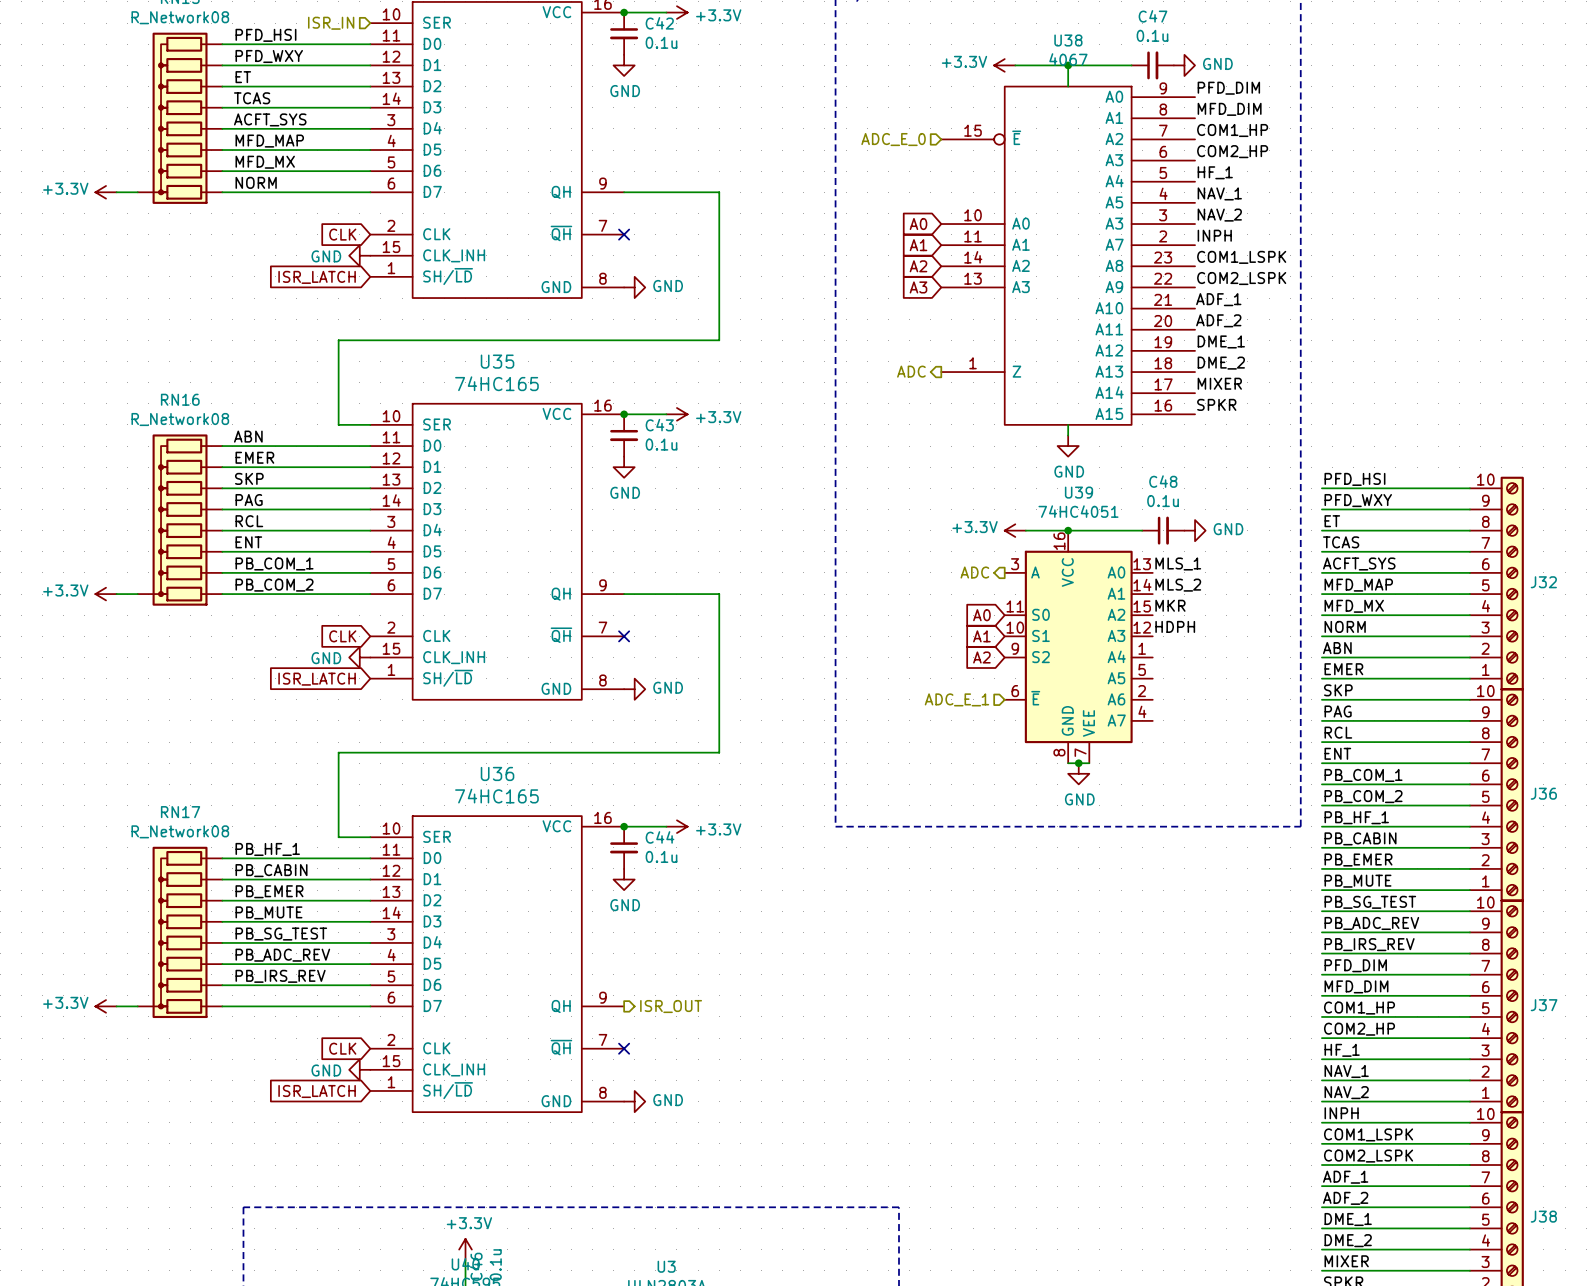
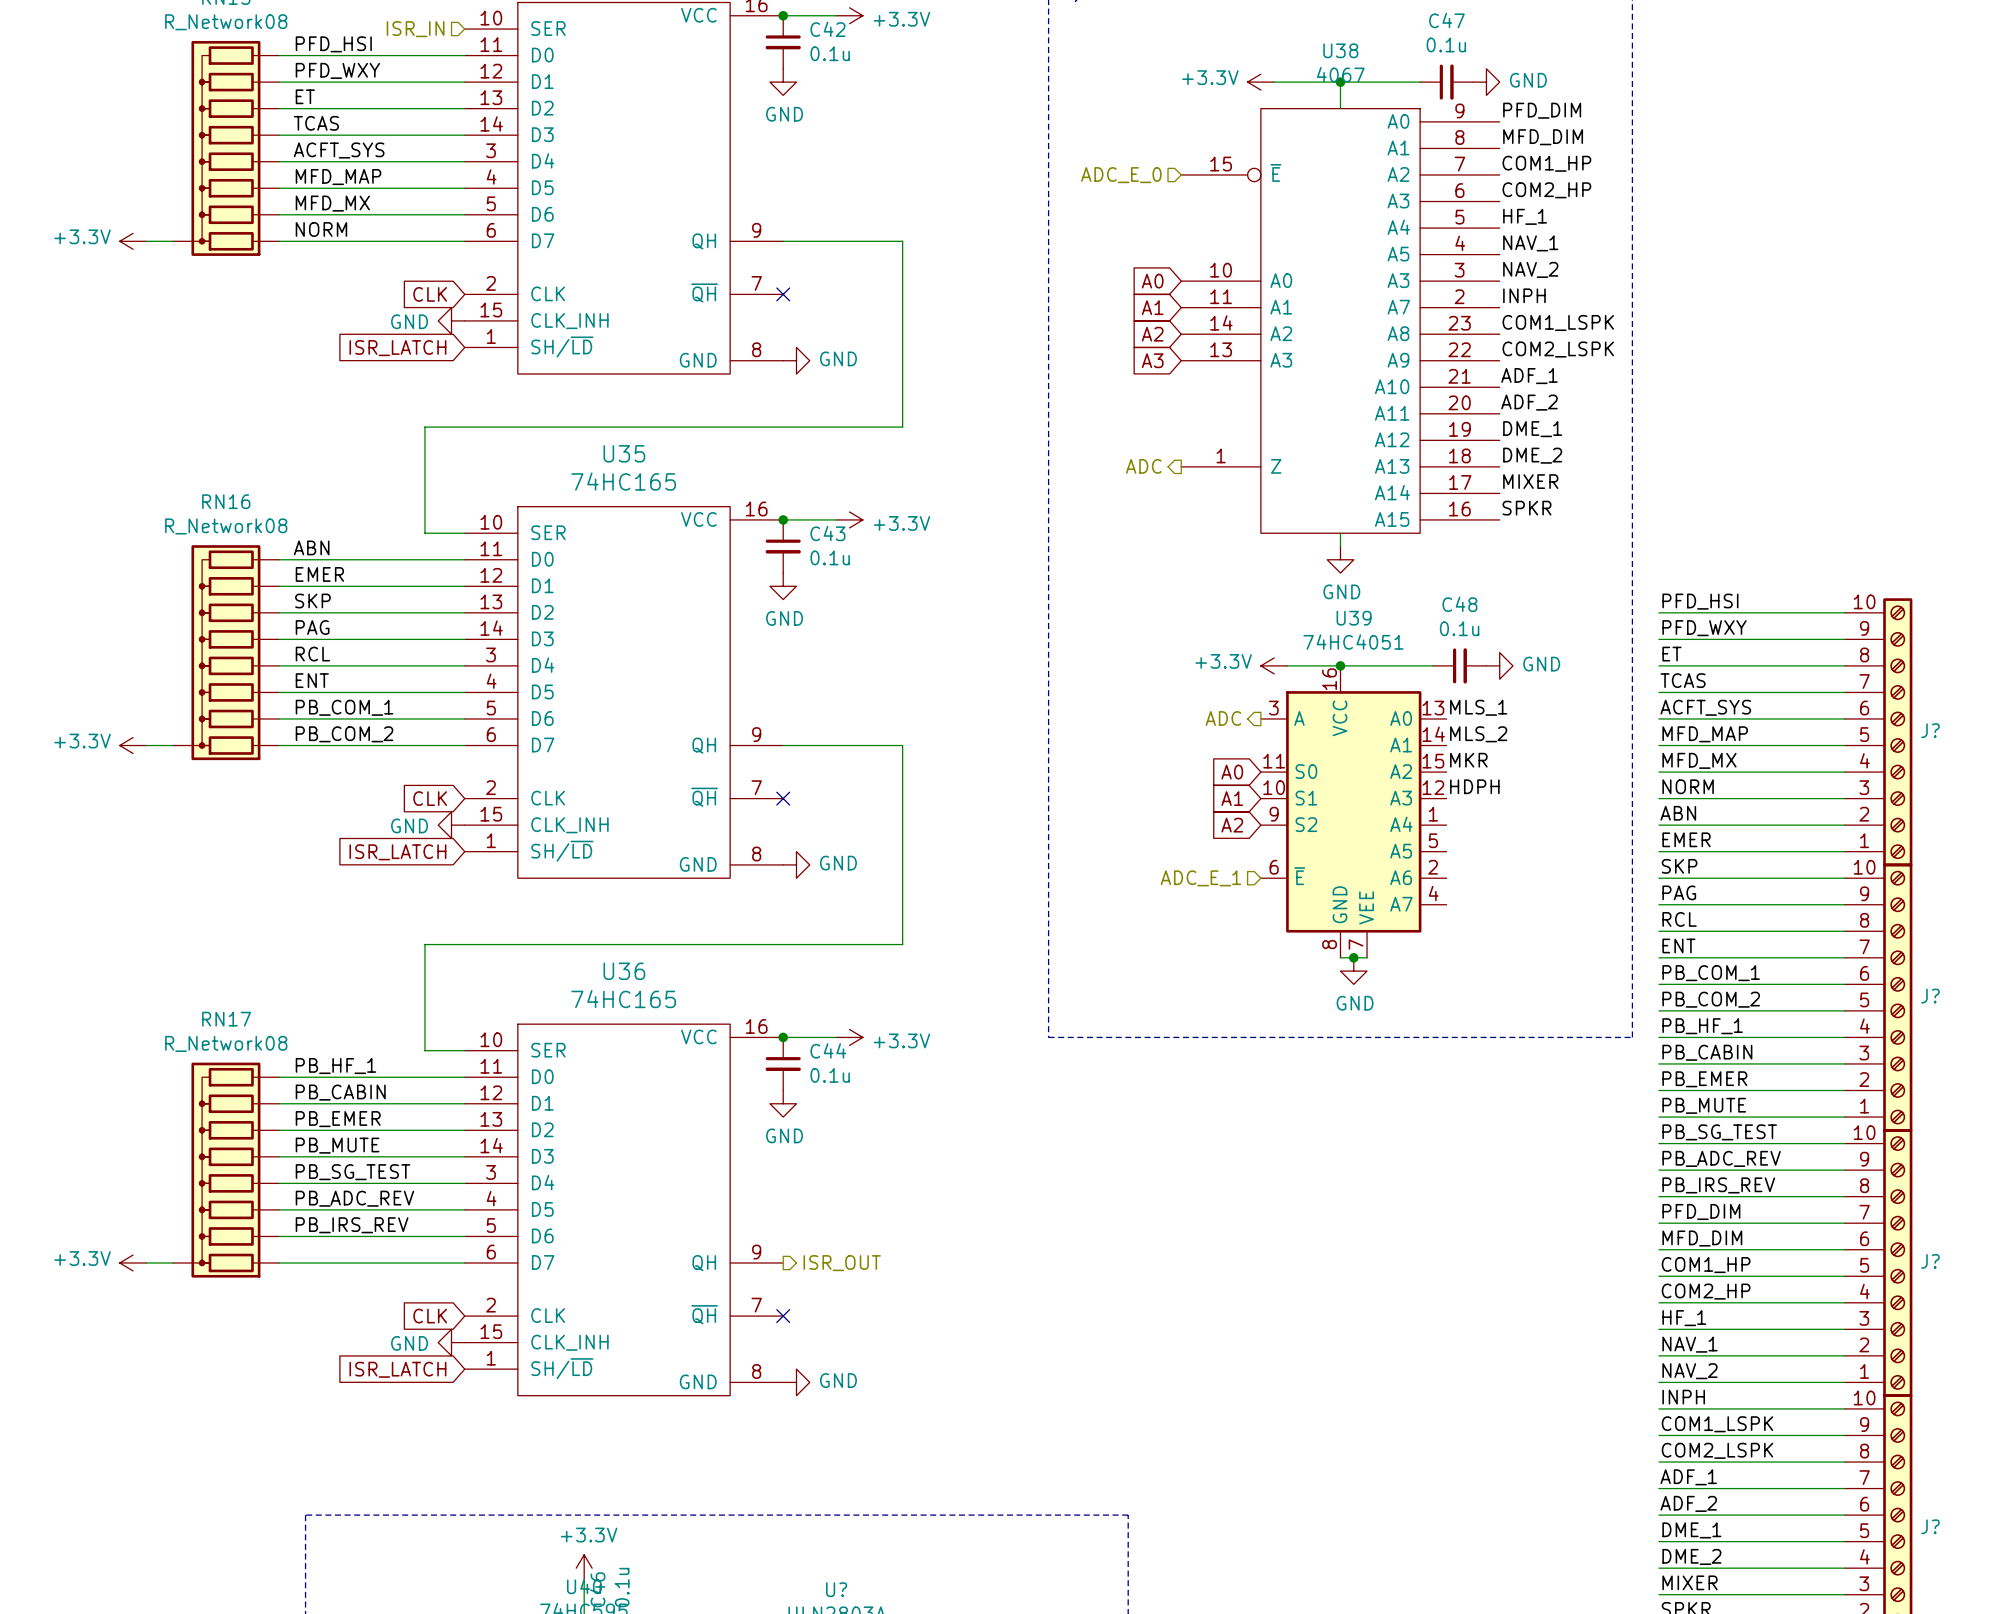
J32 name: J32 (1543, 582) -> J? (1930, 730)
J36 name: J36 (1543, 793) -> J? (1930, 996)
J37 name: J37 (1544, 1005) -> J? (1930, 1261)
J38 name: J38 (1543, 1216) -> J? (1930, 1526)
U3 name: U3 (666, 1266) -> U? (836, 1589)

